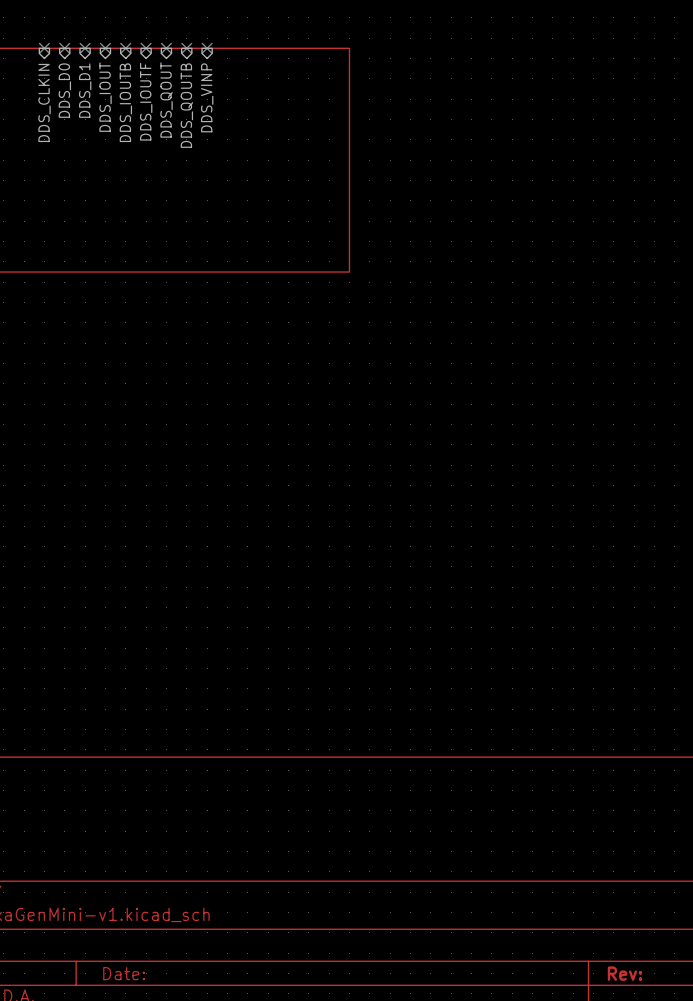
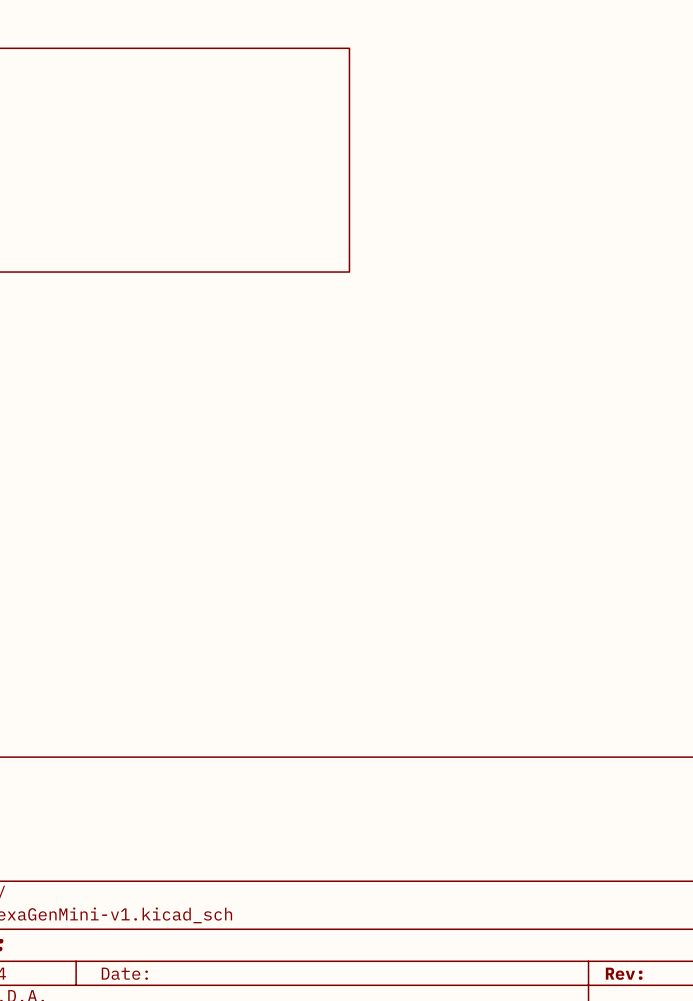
no-connect mark: (44, 48) -> none
no-connect mark: (64, 48) -> none
no-connect mark: (85, 48) -> none
no-connect mark: (105, 48) -> none
no-connect mark: (125, 48) -> none
no-connect mark: (146, 48) -> none
no-connect mark: (166, 48) -> none
no-connect mark: (186, 48) -> none
no-connect mark: (207, 48) -> none
sheet pin: DDS_D0 (64, 90) -> none
sheet pin: DDS_D1 (85, 90) -> none
sheet pin: DDS_IOUT (105, 97) -> none
sheet pin: DDS_VINP (207, 97) -> none
sheet pin: DDS_QOUT (166, 100) -> none
sheet pin: DDS_IOUTF (146, 101) -> none
sheet pin: DDS_CLKIN (44, 102) -> none
sheet pin: DDS_IOUTB (125, 102) -> none
sheet pin: DDS_QOUTB (186, 105) -> none

